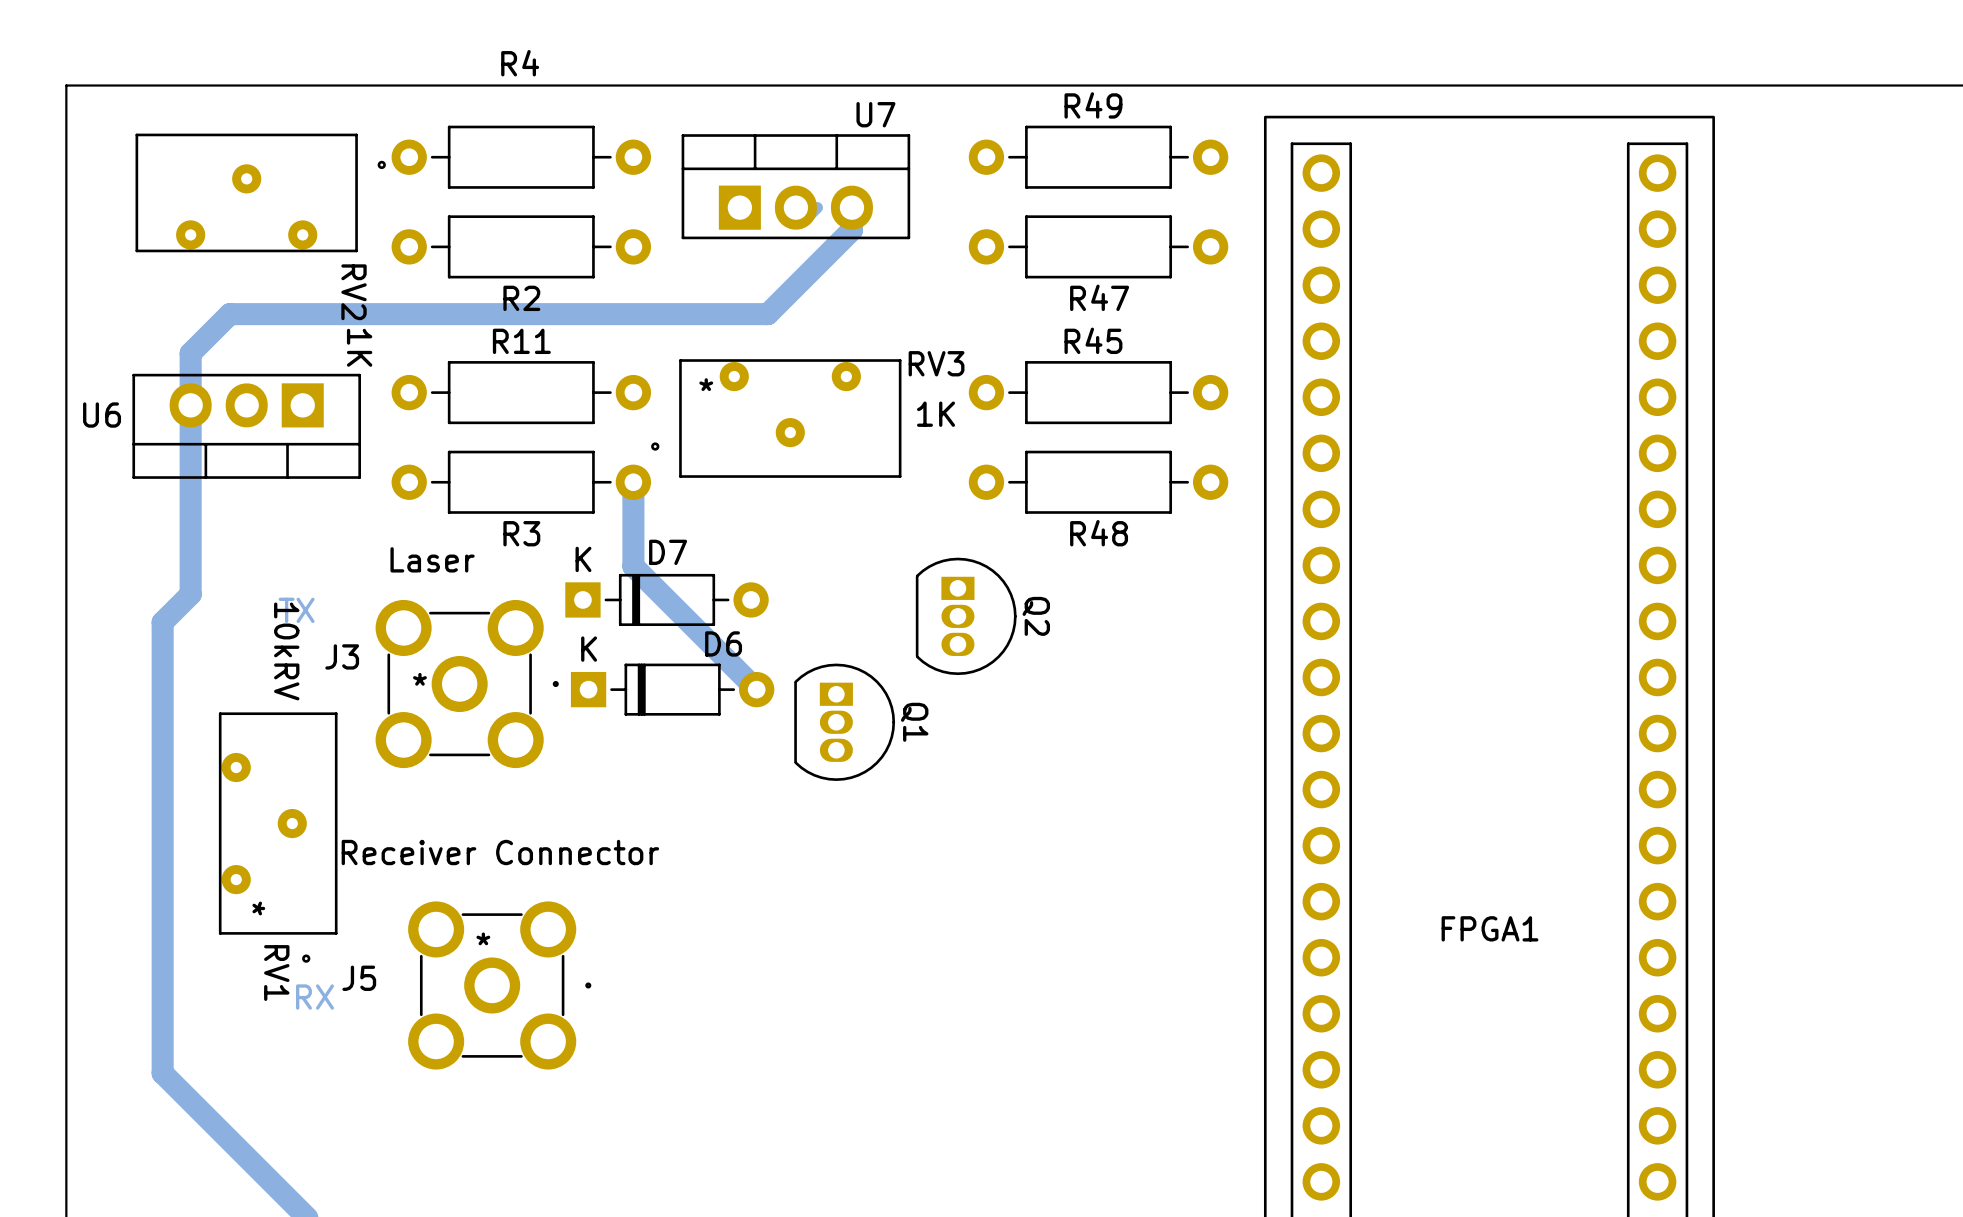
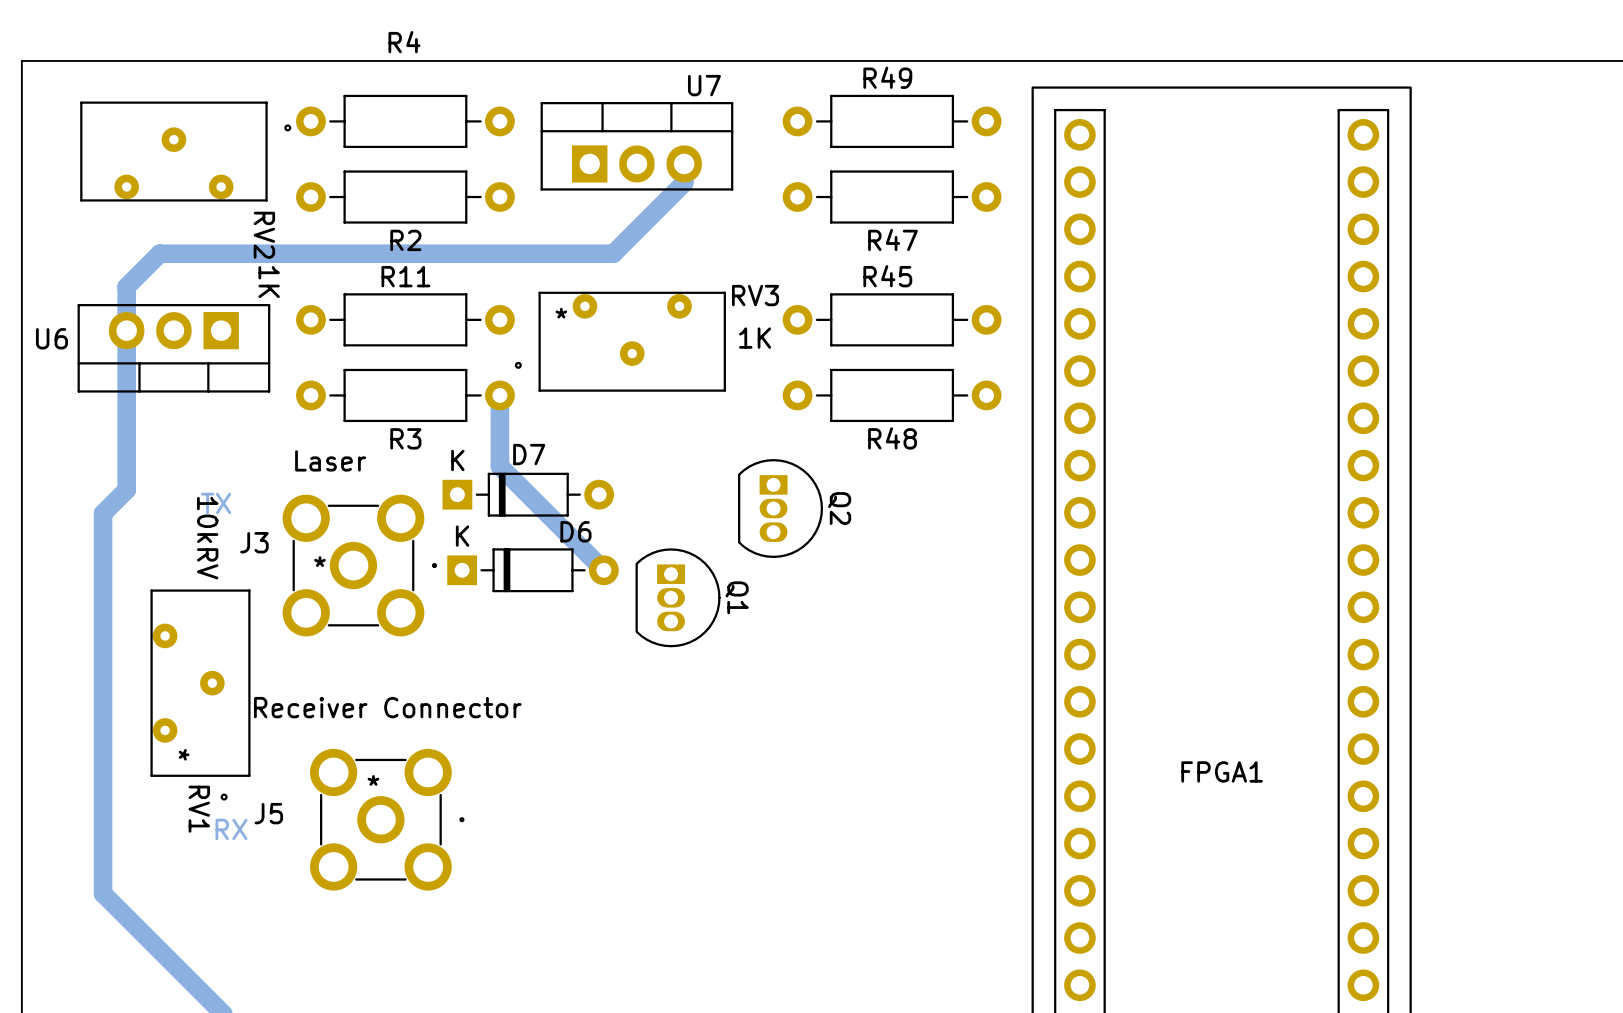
track: (817, 207) (806, 218) -> none

